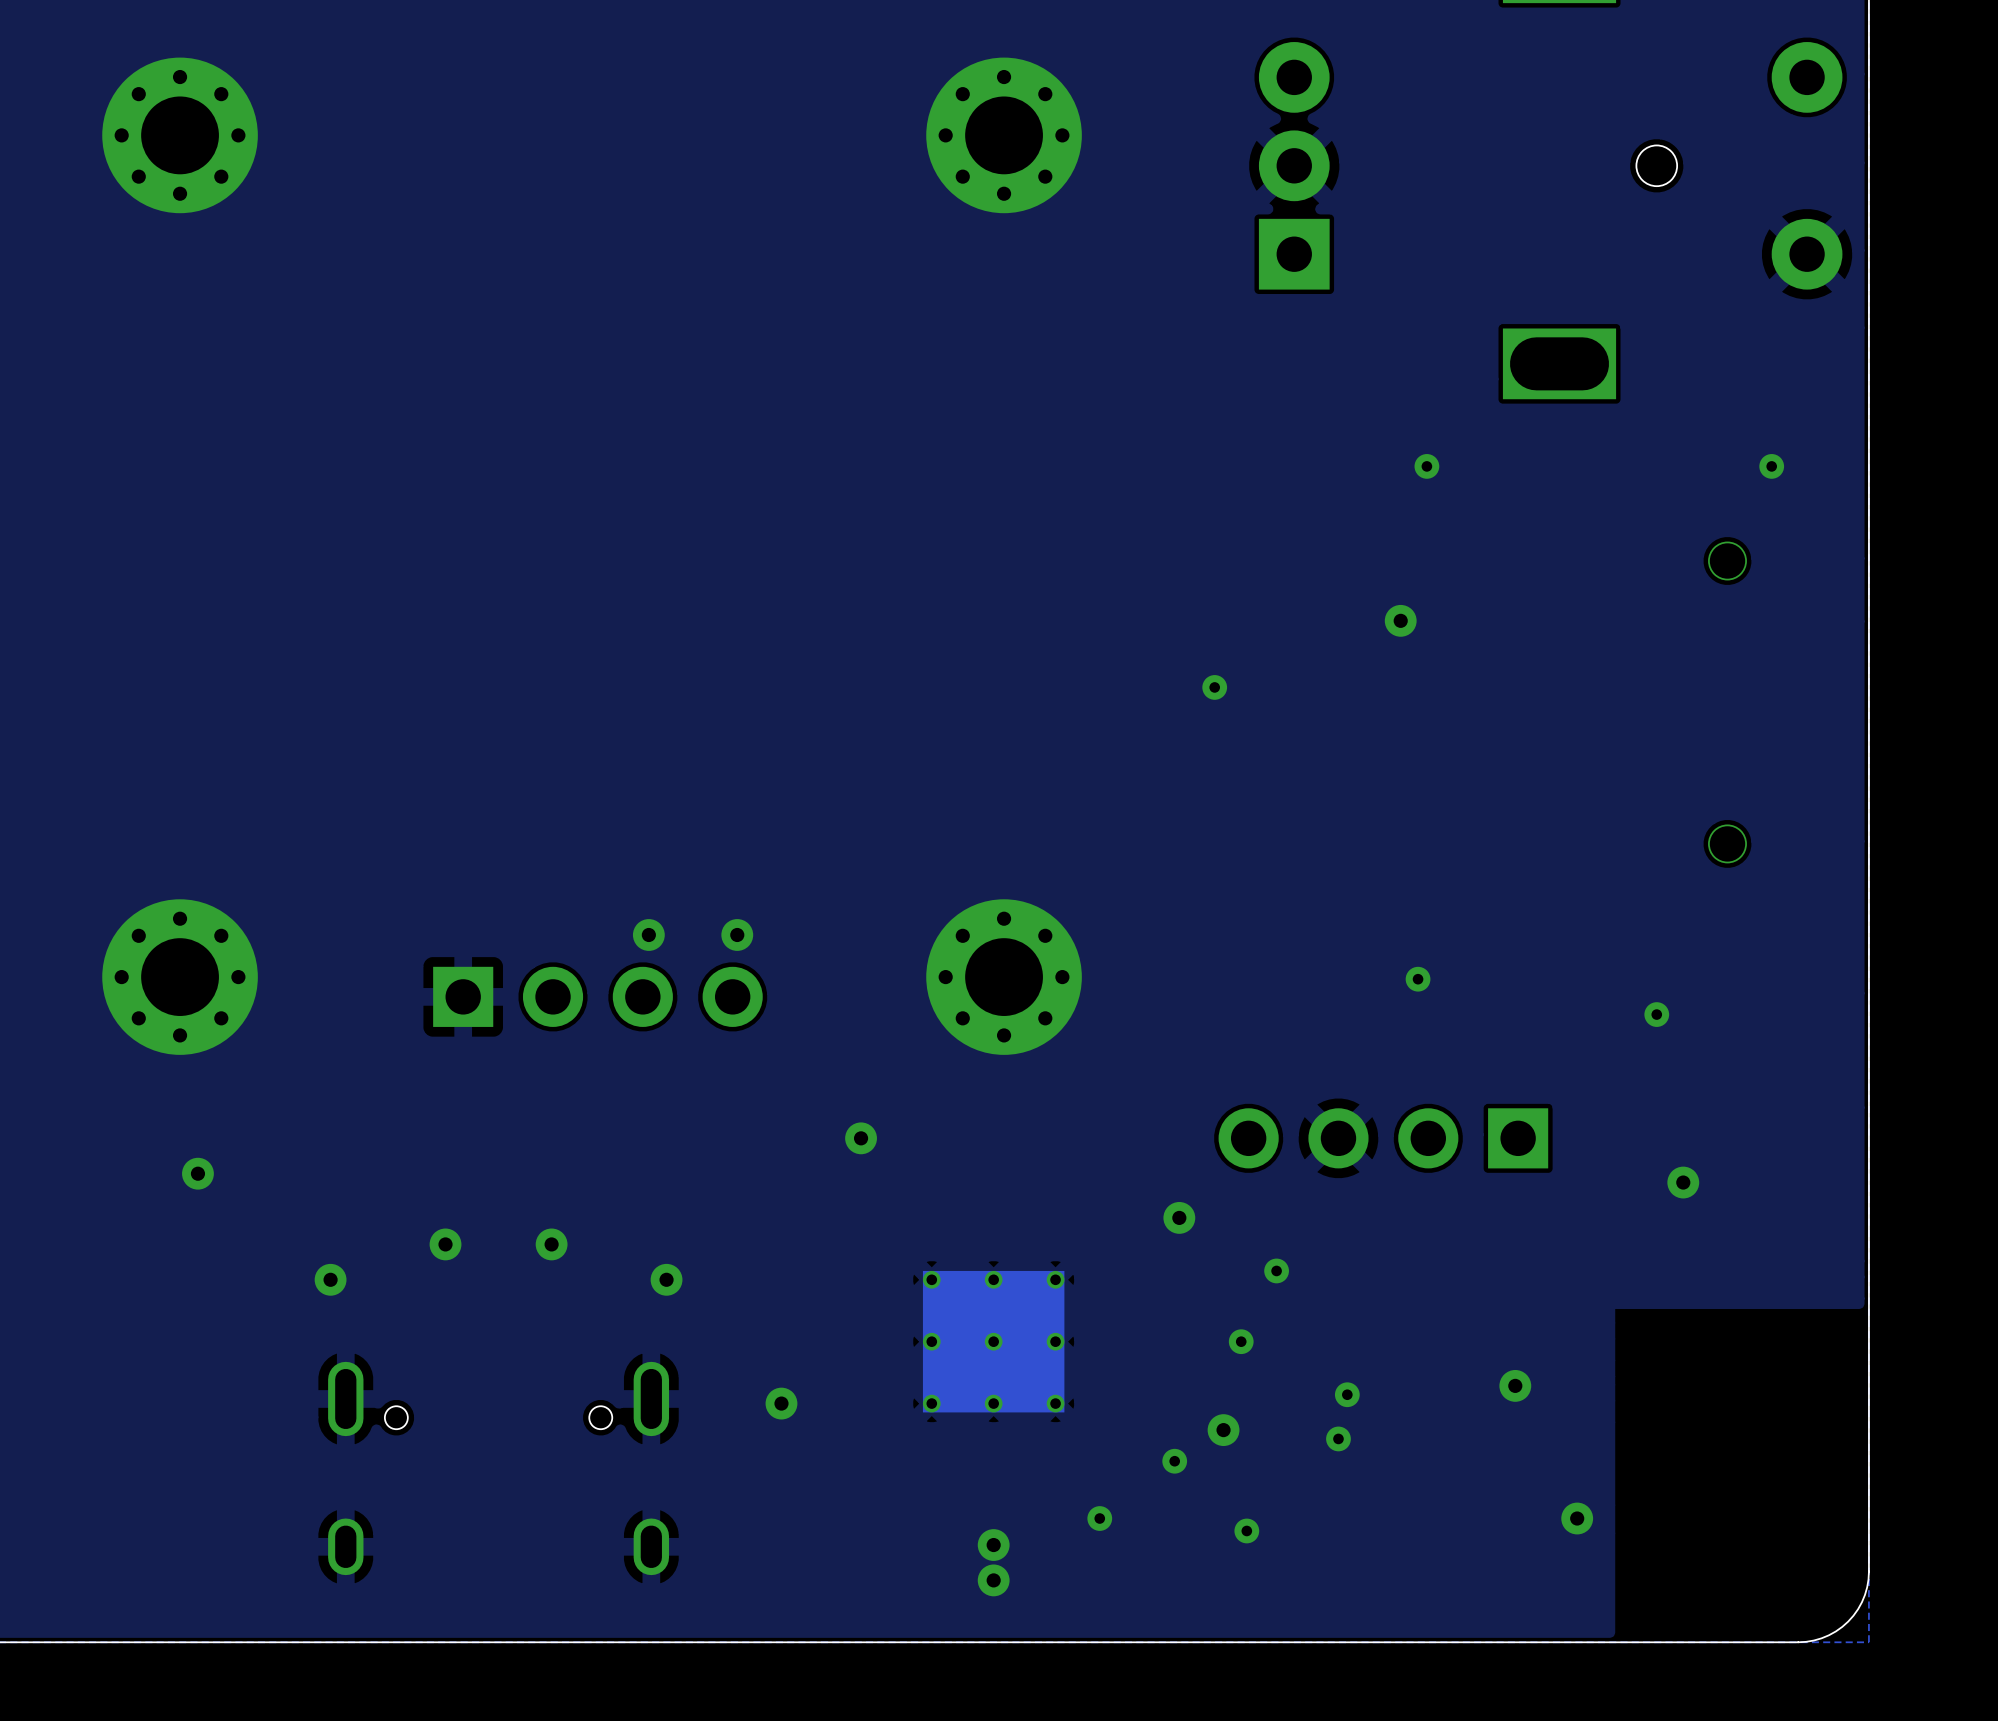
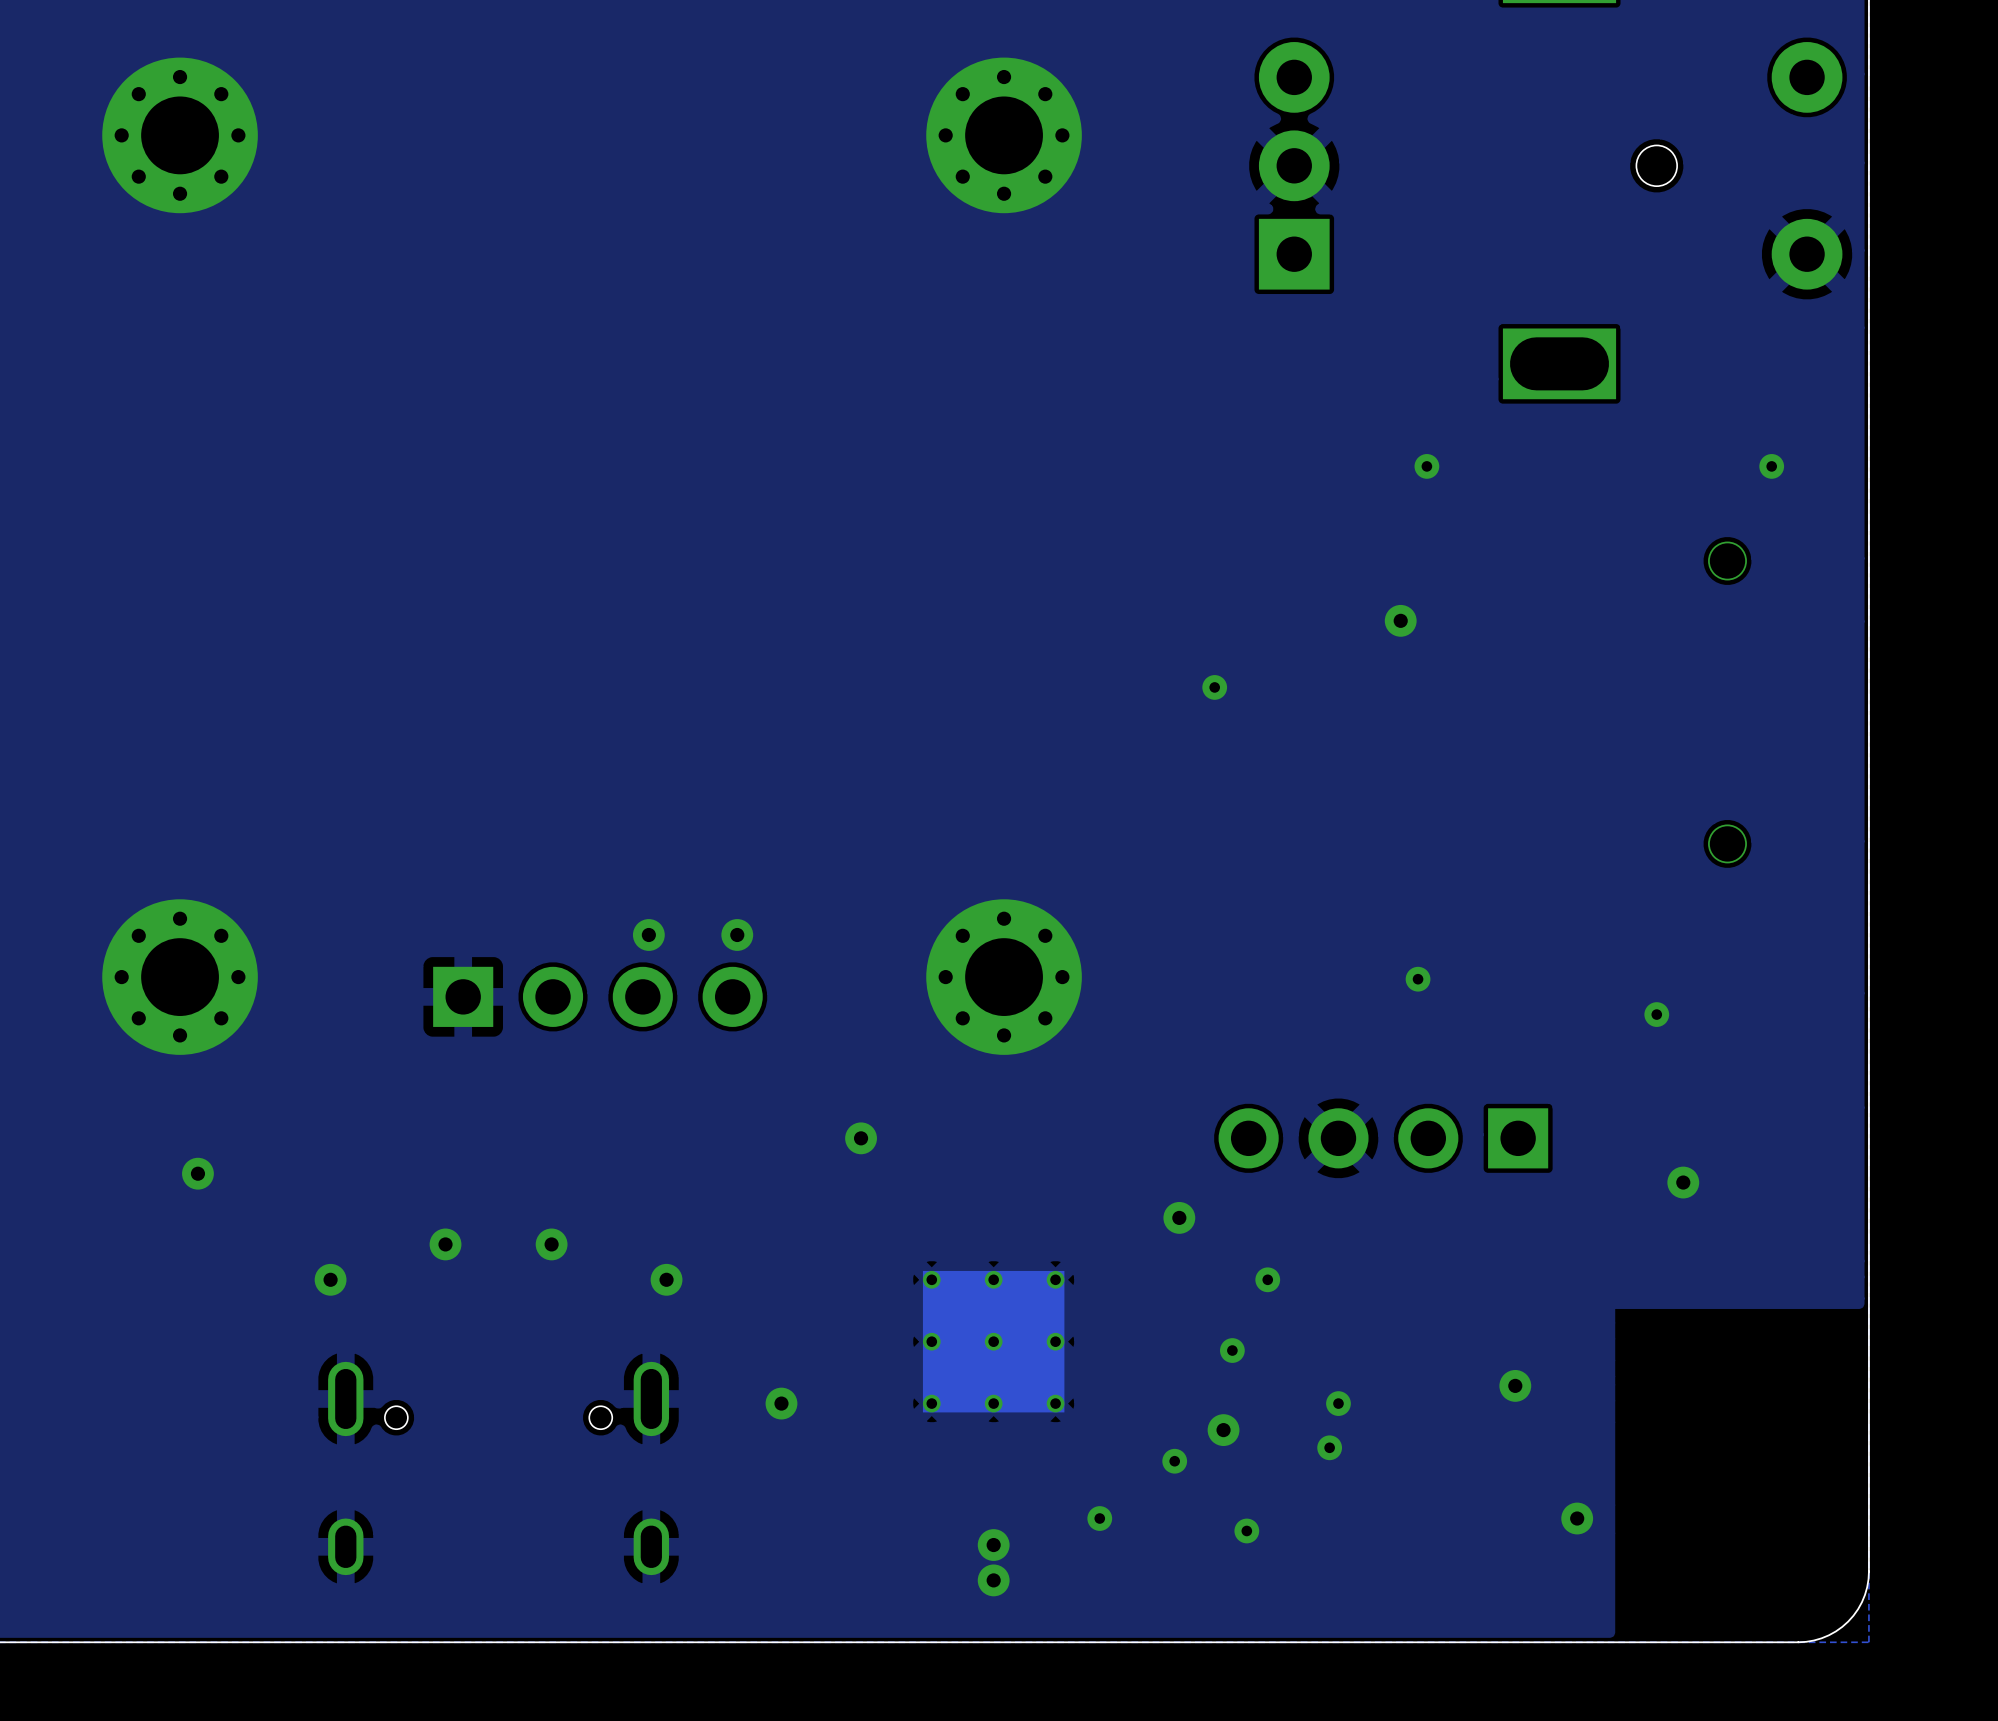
via position: (1276, 1270) -> (1267, 1279)
via position: (1241, 1341) -> (1232, 1350)
via position: (1347, 1394) -> (1338, 1403)
via position: (1338, 1438) -> (1329, 1447)

